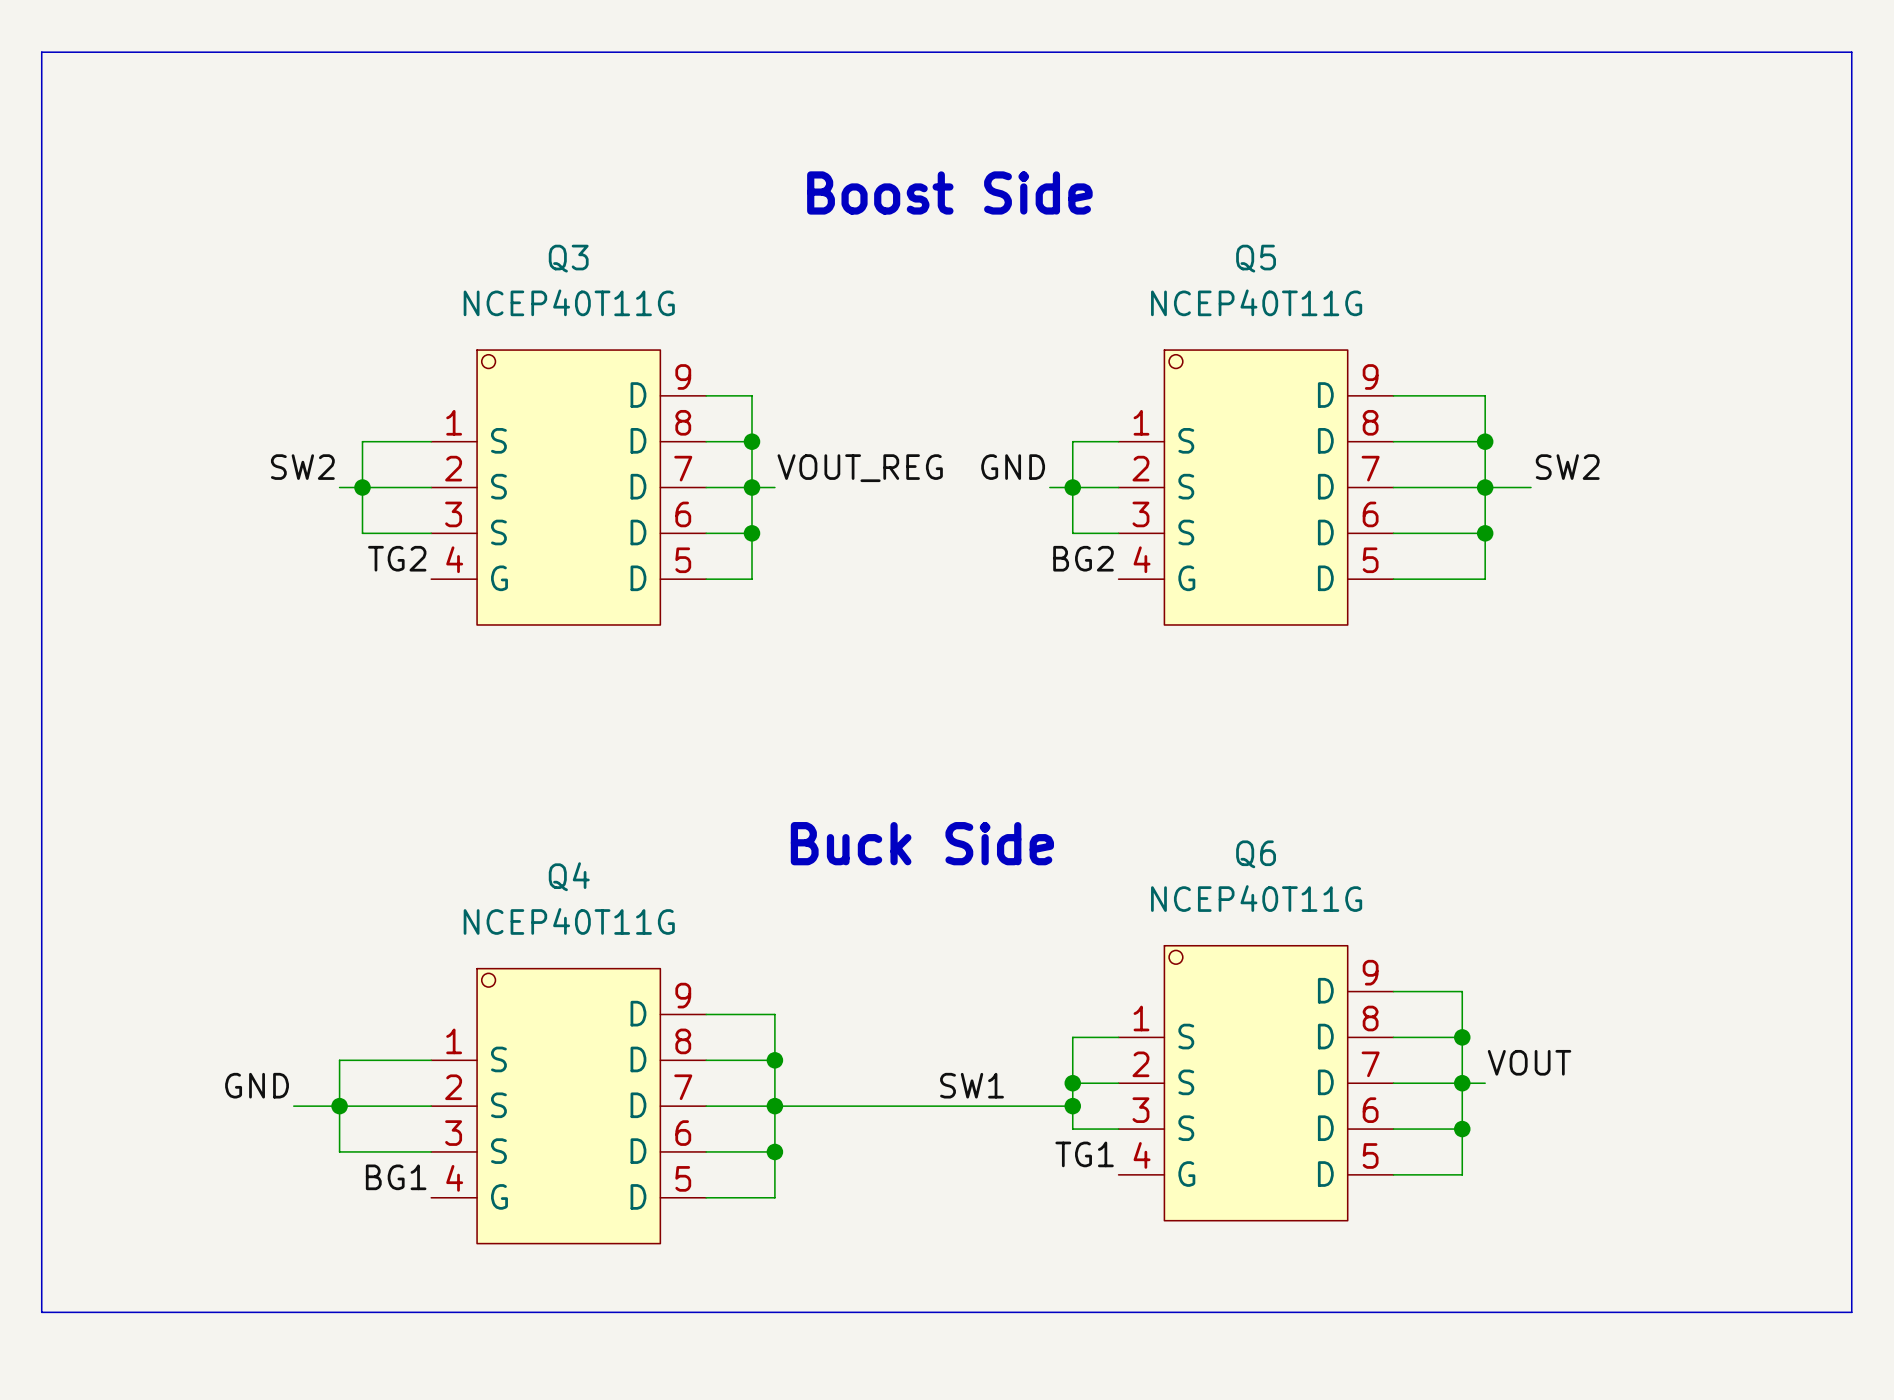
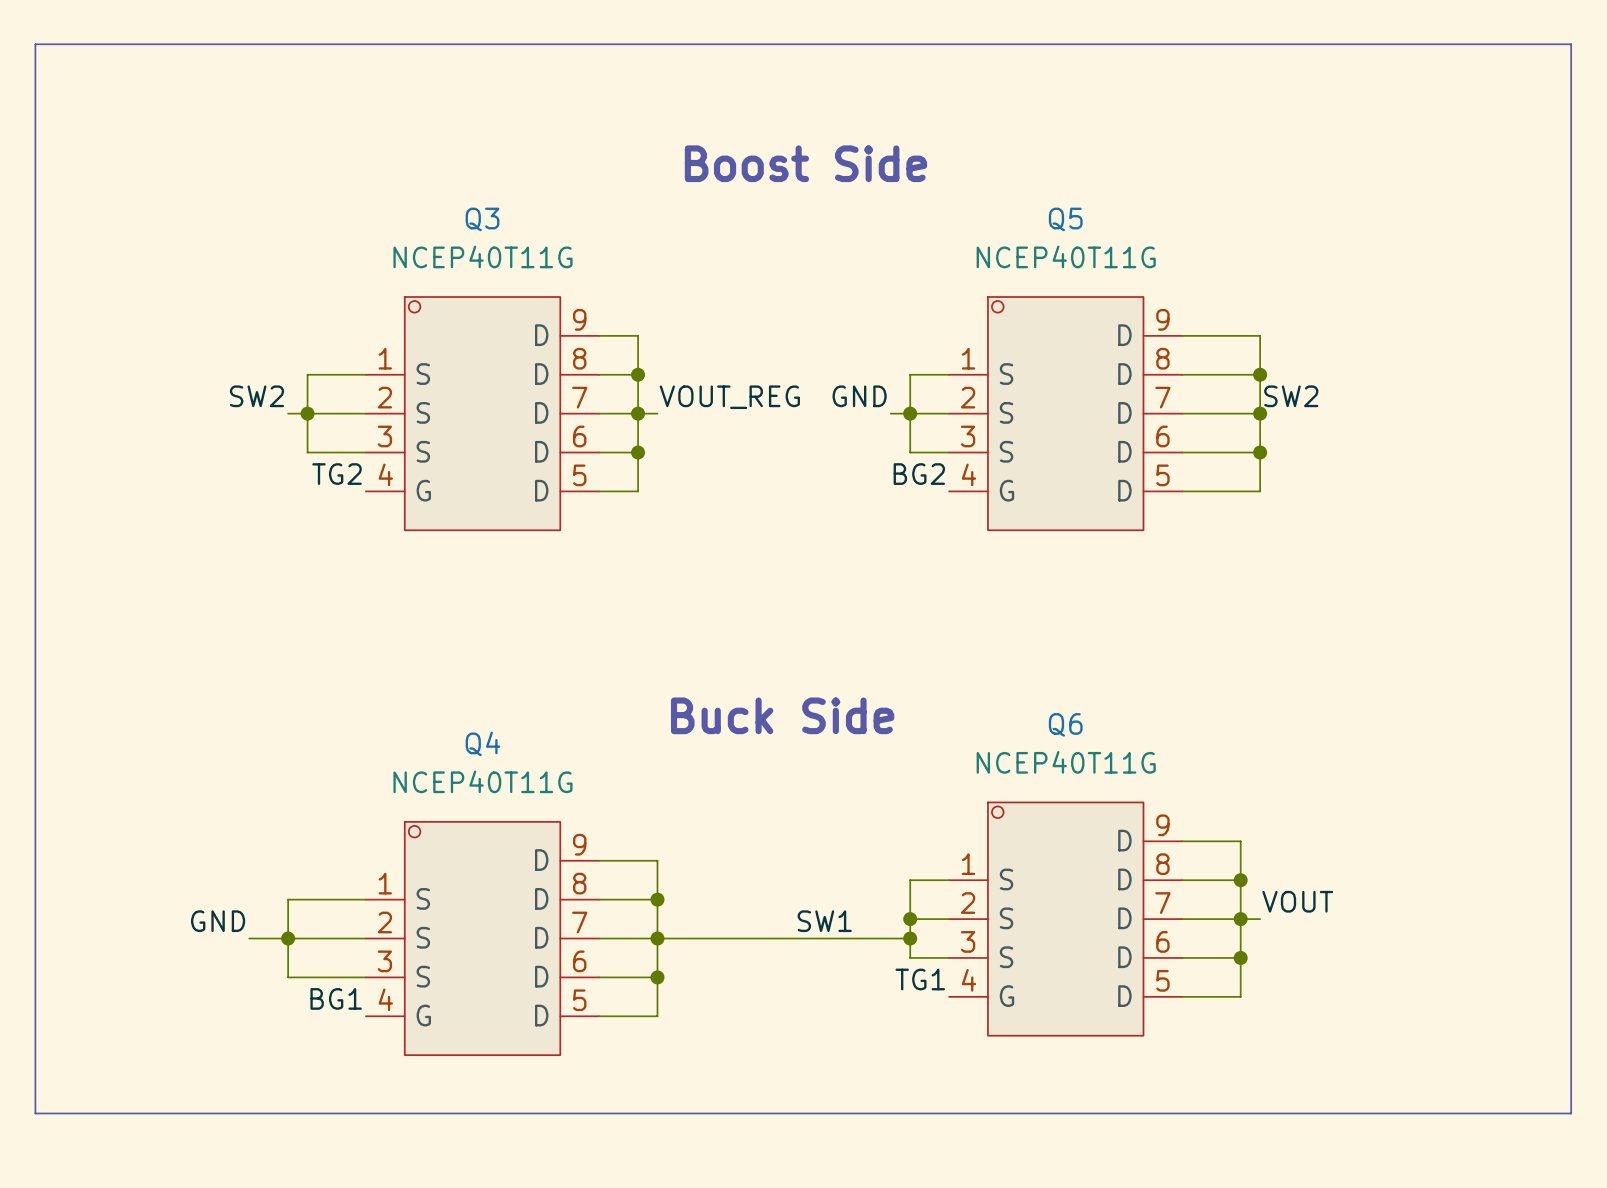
label position: SW2 (1567, 467) -> SW2 (1291, 396)
wire: (1485, 487) (1530, 487) -> none

